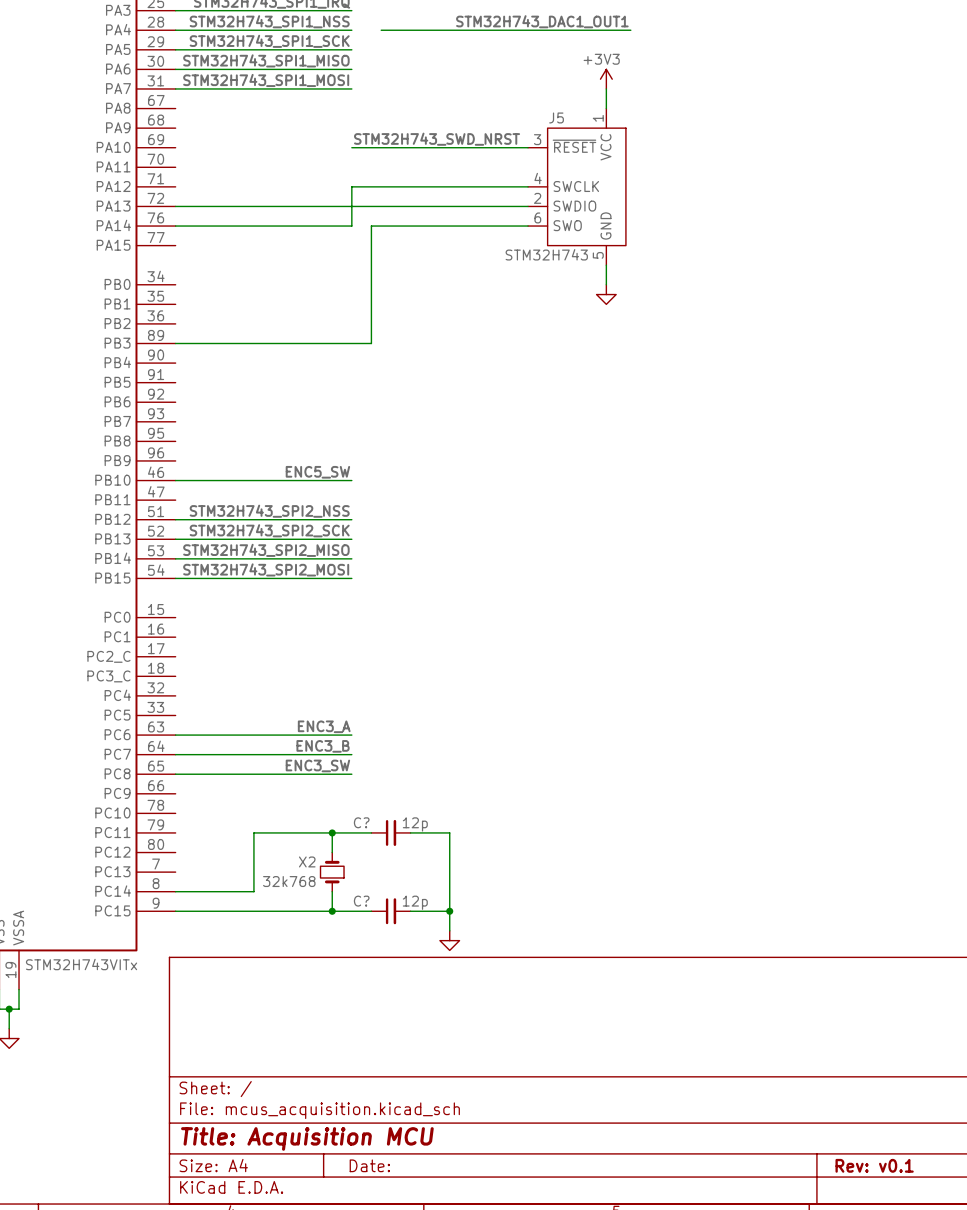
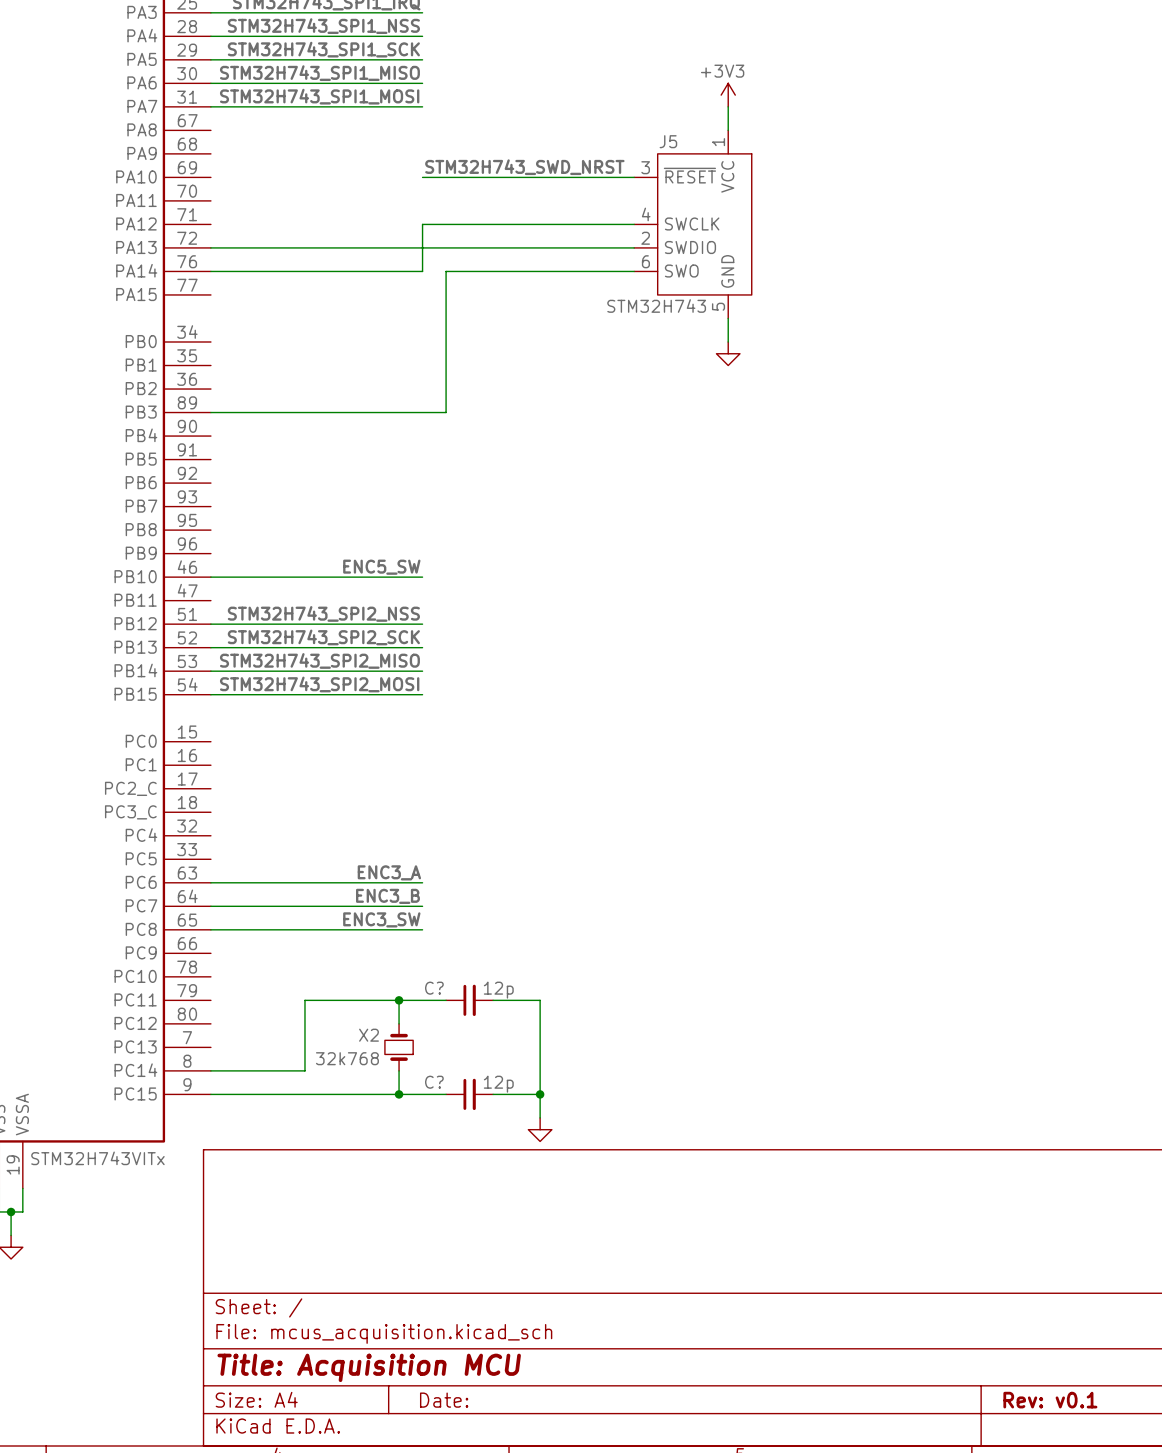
label: STM32H743_DAC1_OUT1 (542, 21) -> none
wire: (381, 30) (630, 30) -> none

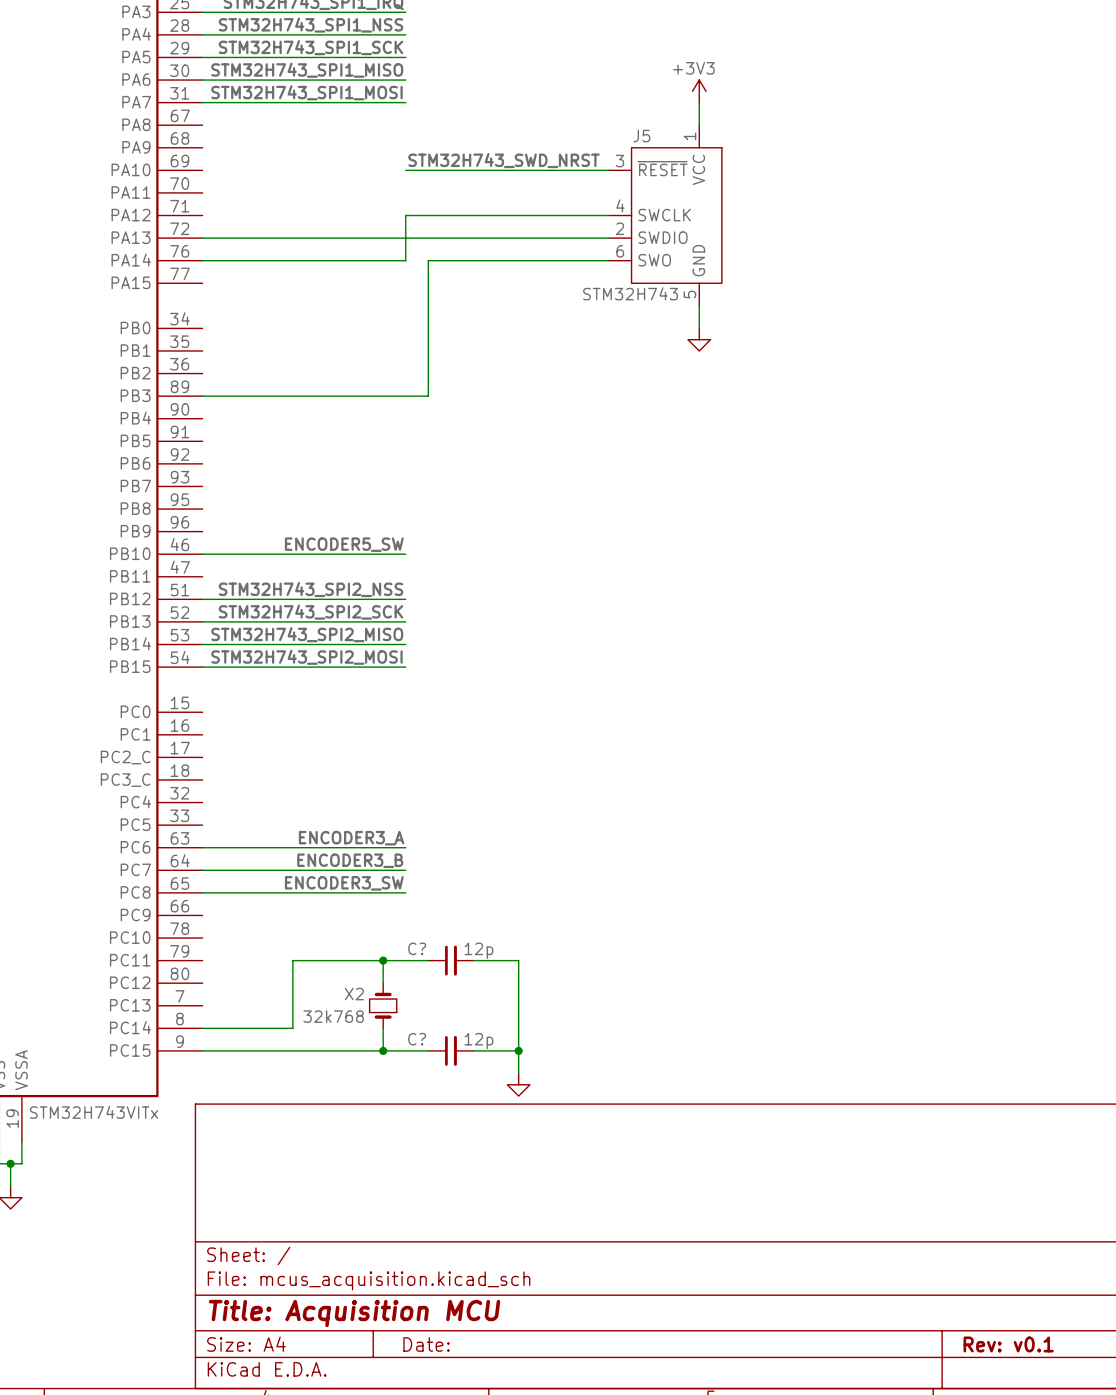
label: ENC5_SW (381, 567) -> ENCODER5_SW (344, 544)
label: ENC3_A (389, 872) -> ENCODER3_A (351, 838)
label: ENC3_B (387, 896) -> ENCODER3_B (350, 860)
label: ENC3_SW (381, 919) -> ENCODER3_SW (344, 883)

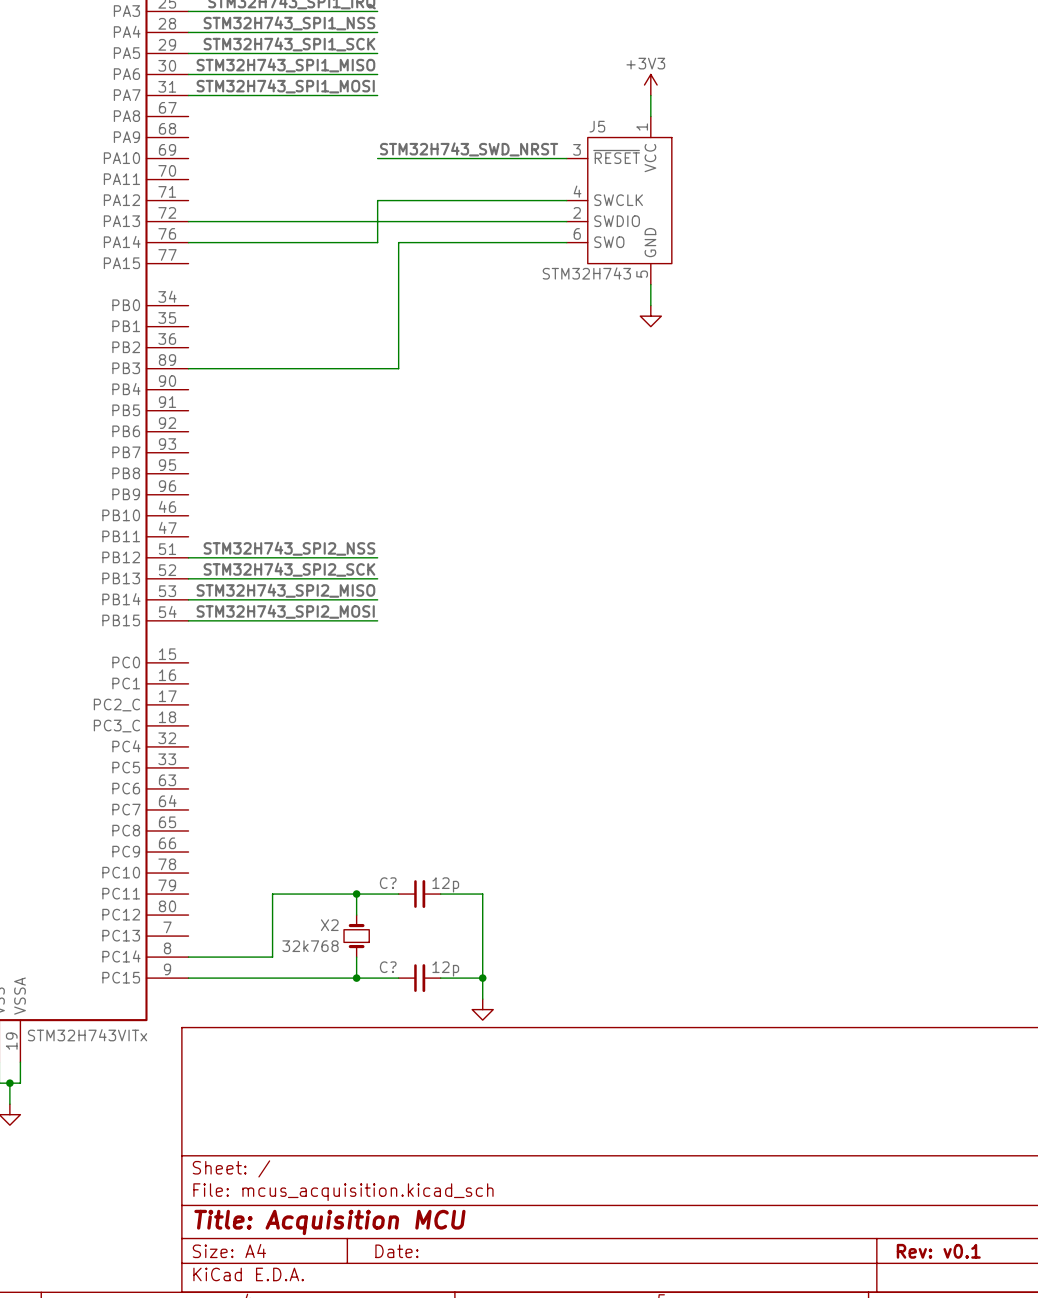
label: ENCODER5_SW (344, 544) -> none
wire: (202, 554) (405, 554) -> none
label: ENCODER3_A (351, 838) -> none
wire: (202, 847) (405, 847) -> none
label: ENCODER3_B (350, 860) -> none
wire: (202, 870) (405, 870) -> none
label: ENCODER3_SW (344, 883) -> none
wire: (202, 892) (405, 892) -> none

